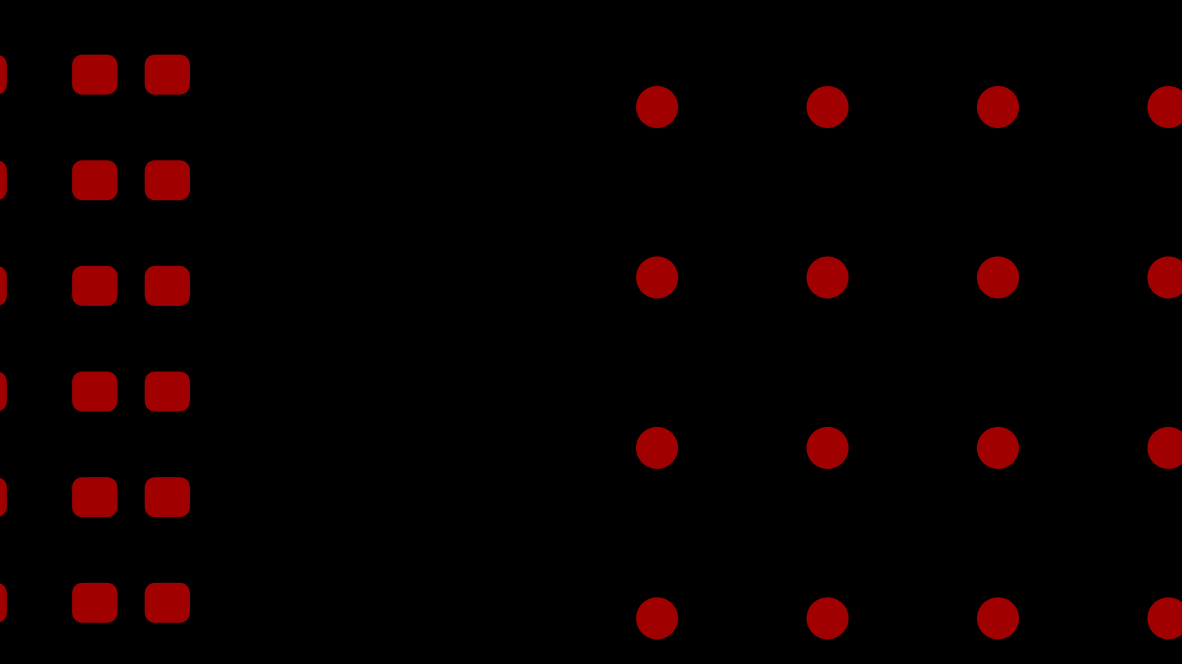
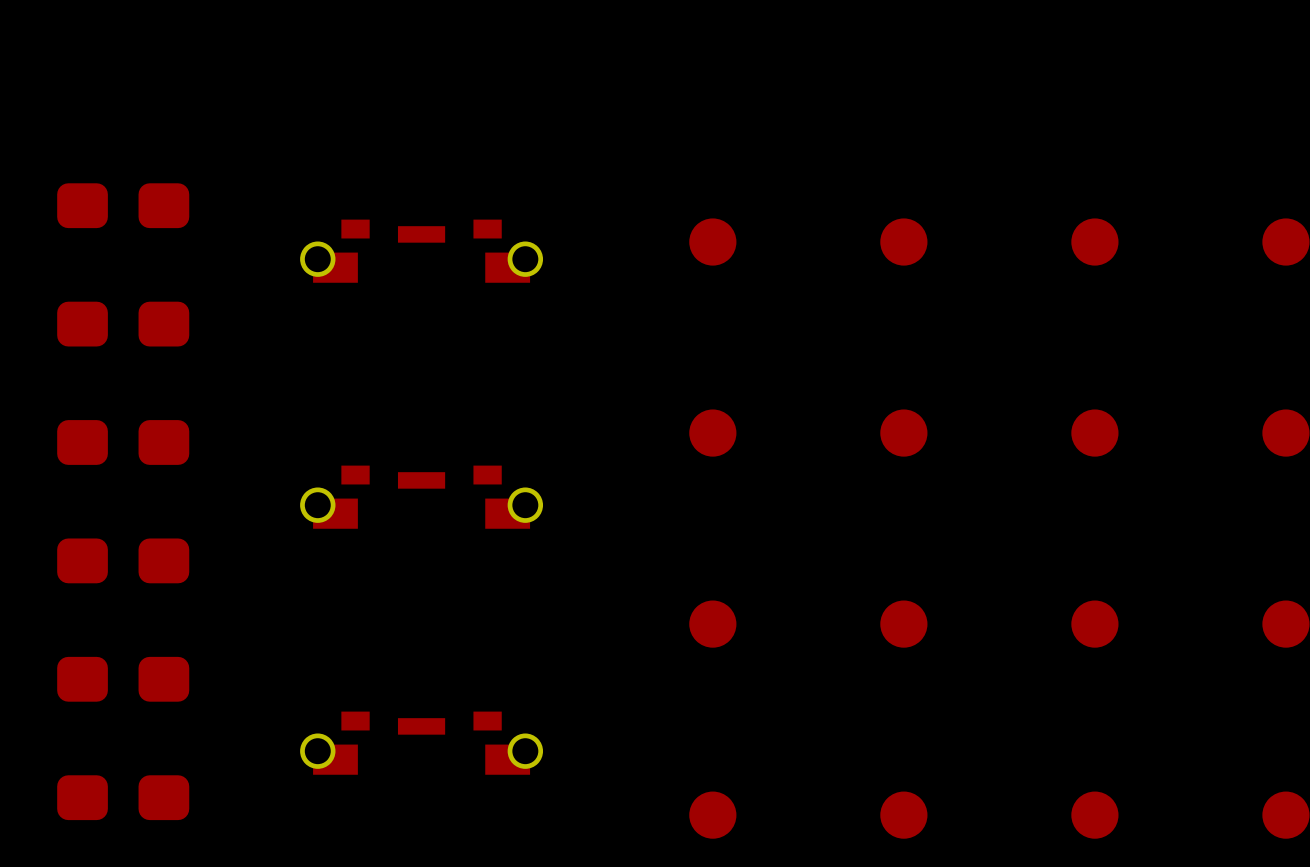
part: none -> (421, 251)
part: none -> (421, 497)
part: none -> (421, 743)

